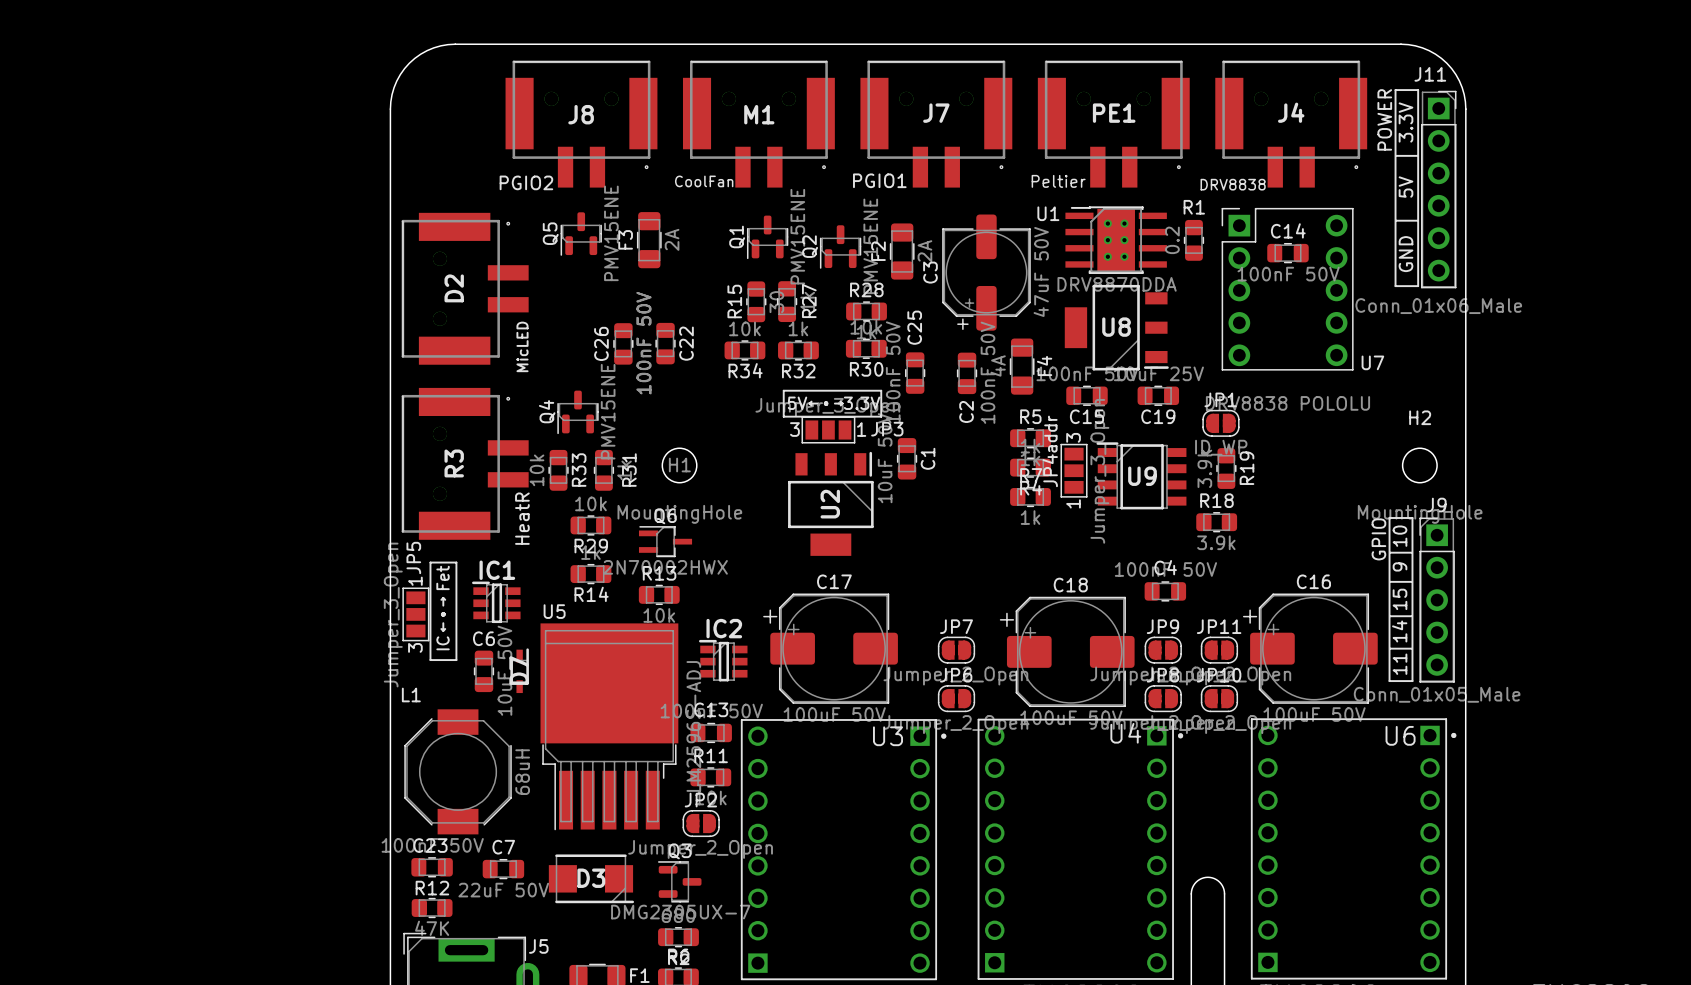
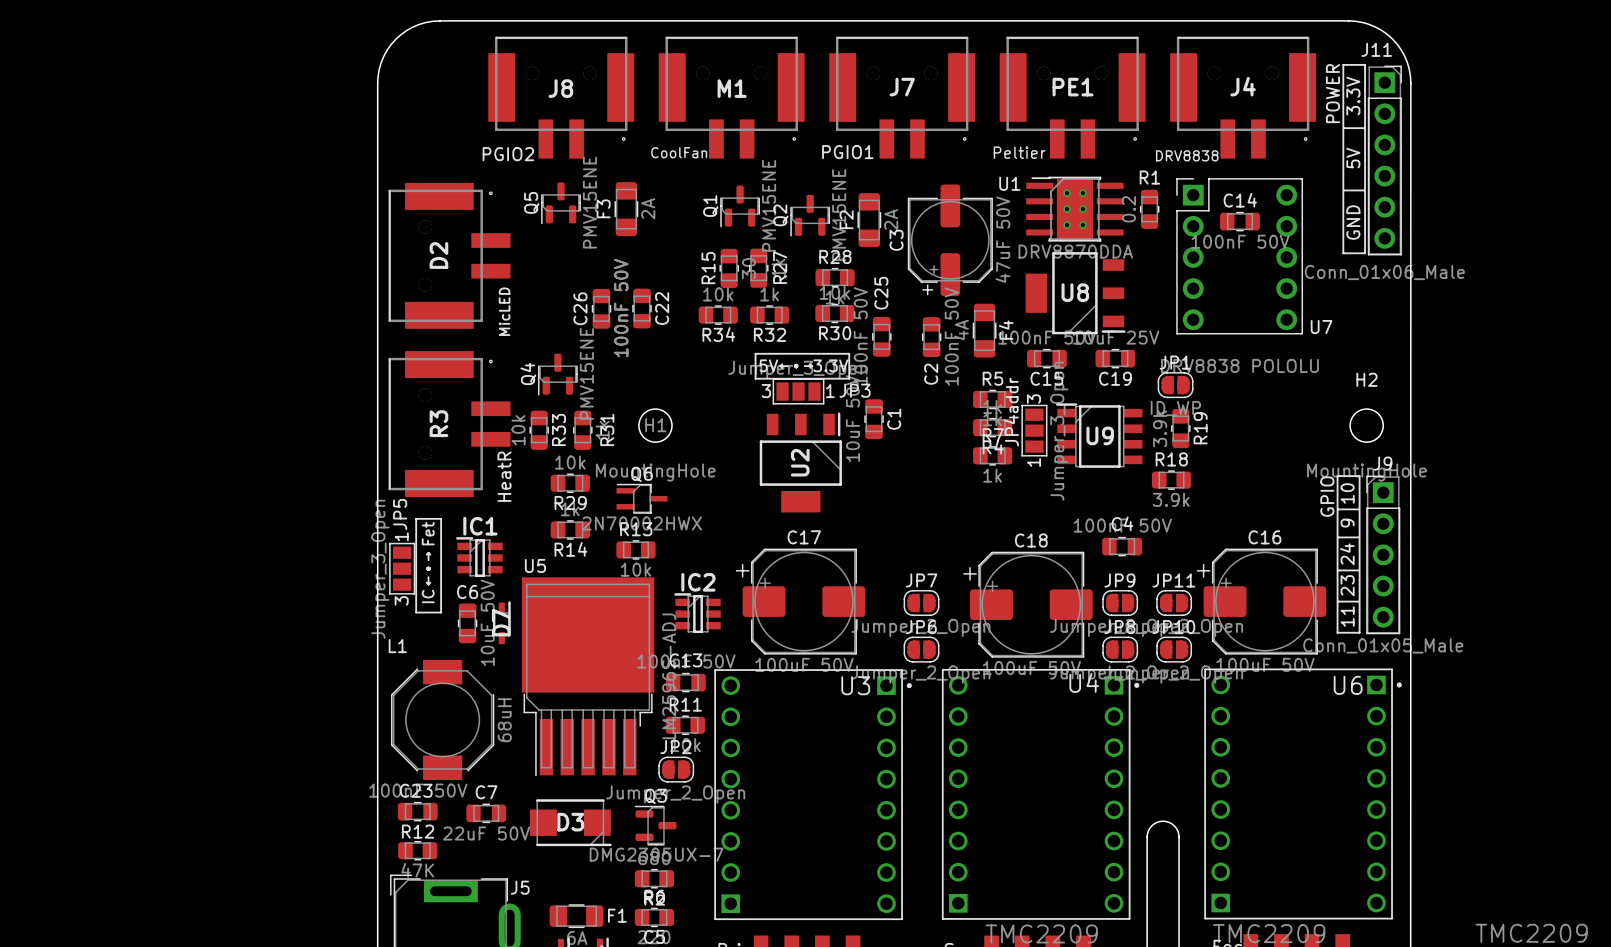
text: 15 (1400, 599) -> 24 (1347, 554)
text: 14 (1399, 631) -> 23 (1347, 585)

